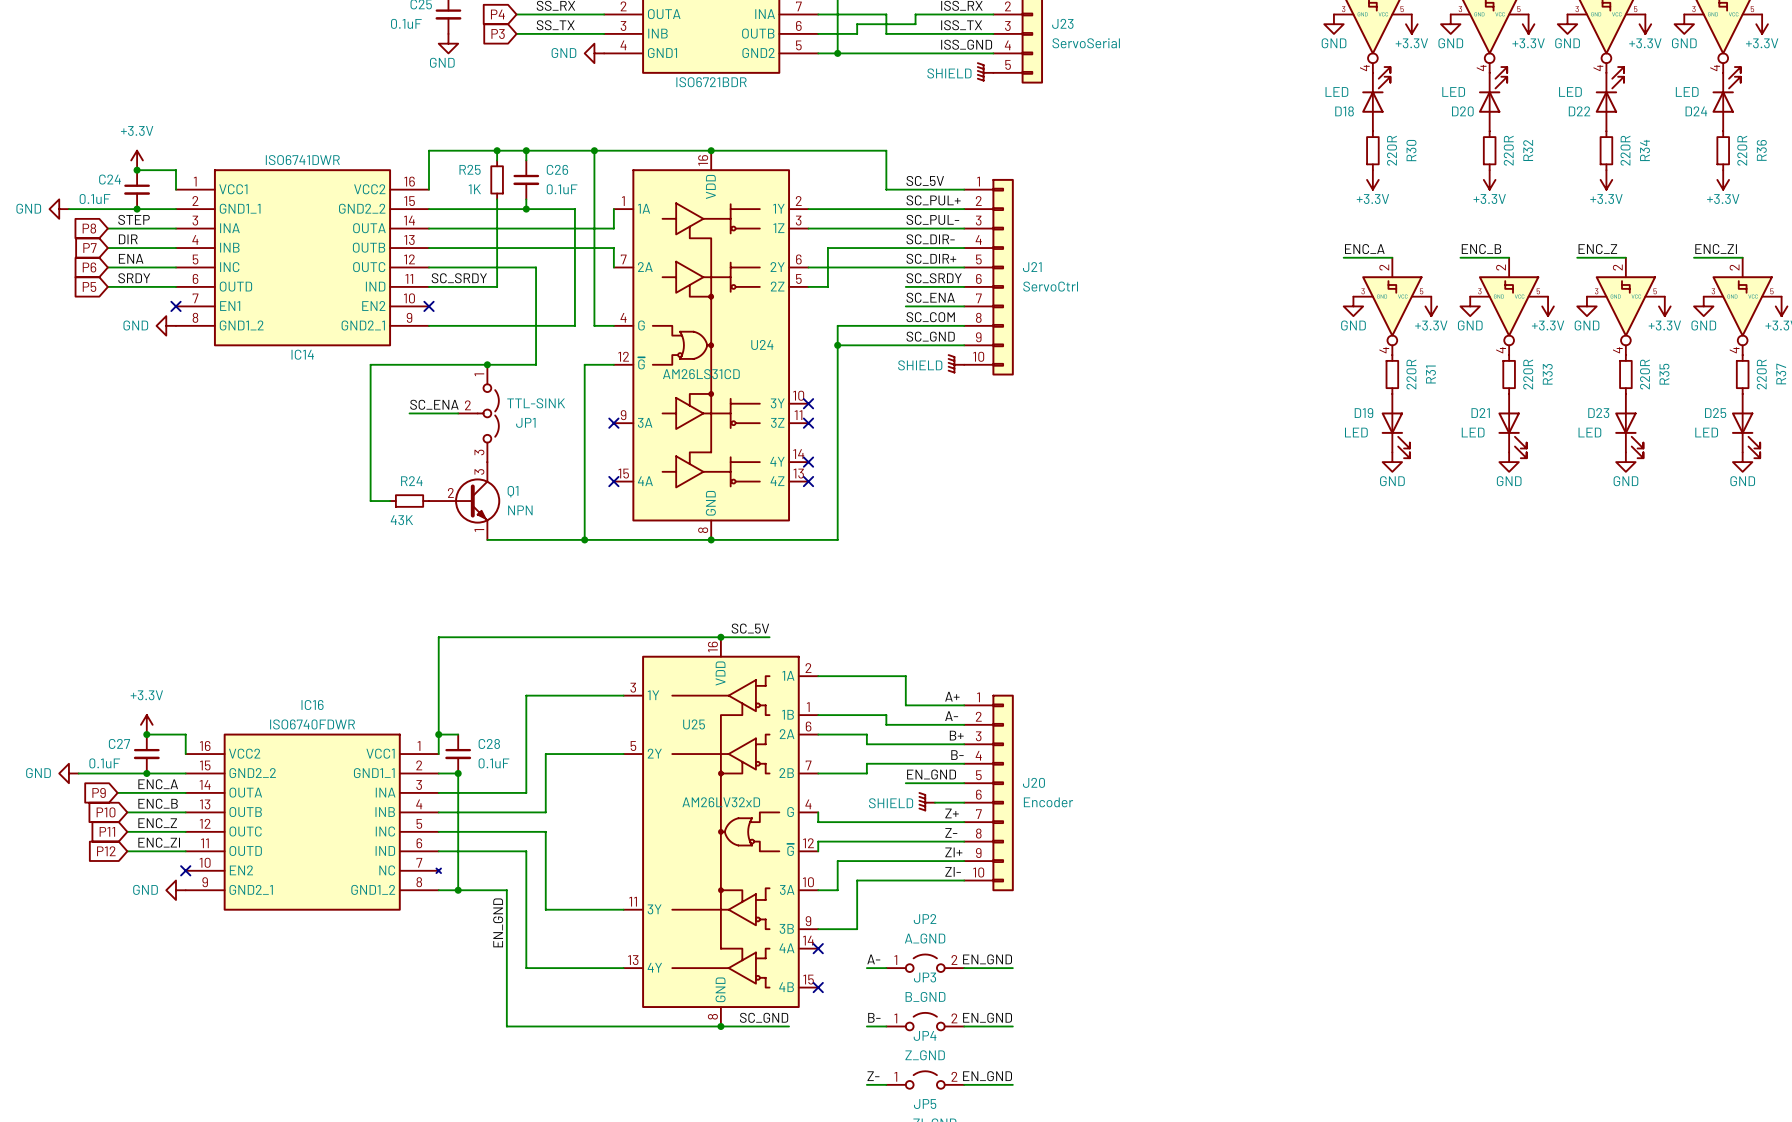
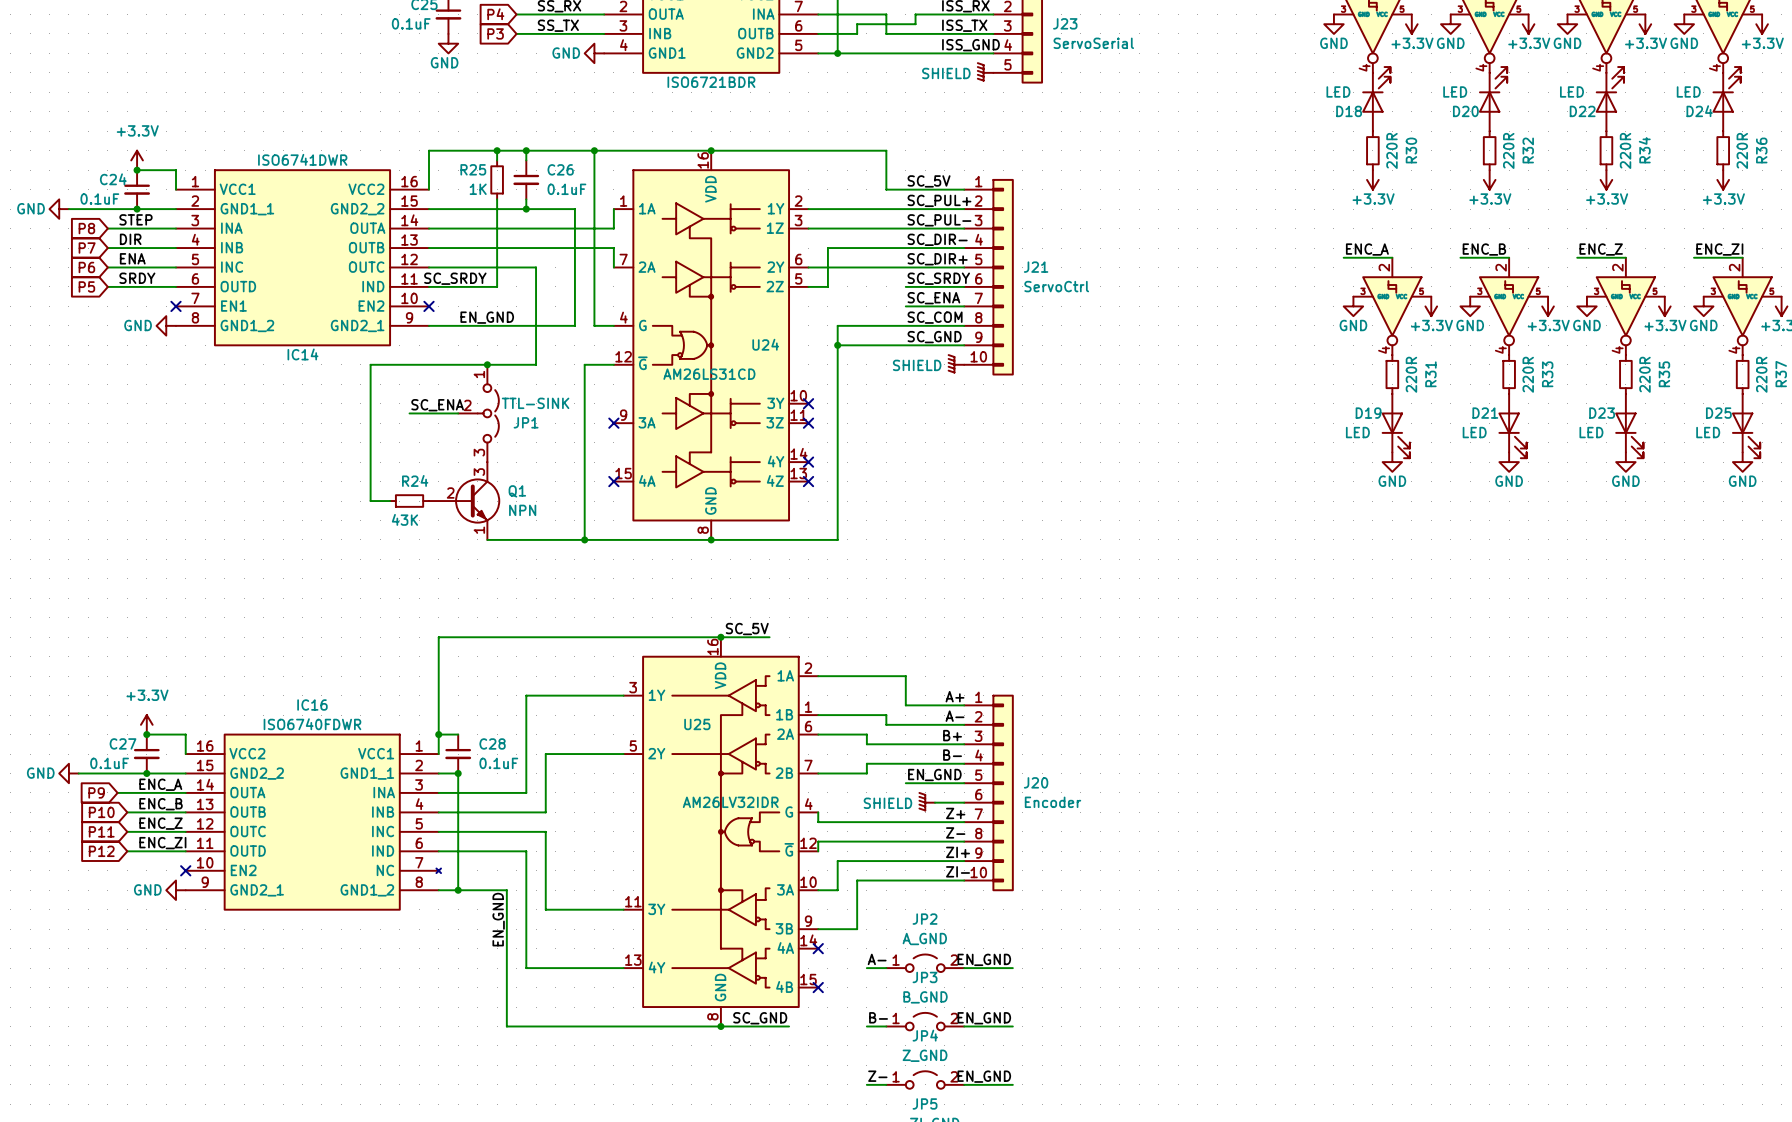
label: none -> EN_GND (487, 317)
U25 value: AM26LV32xD (721, 802) -> AM26LV32IDR (730, 802)

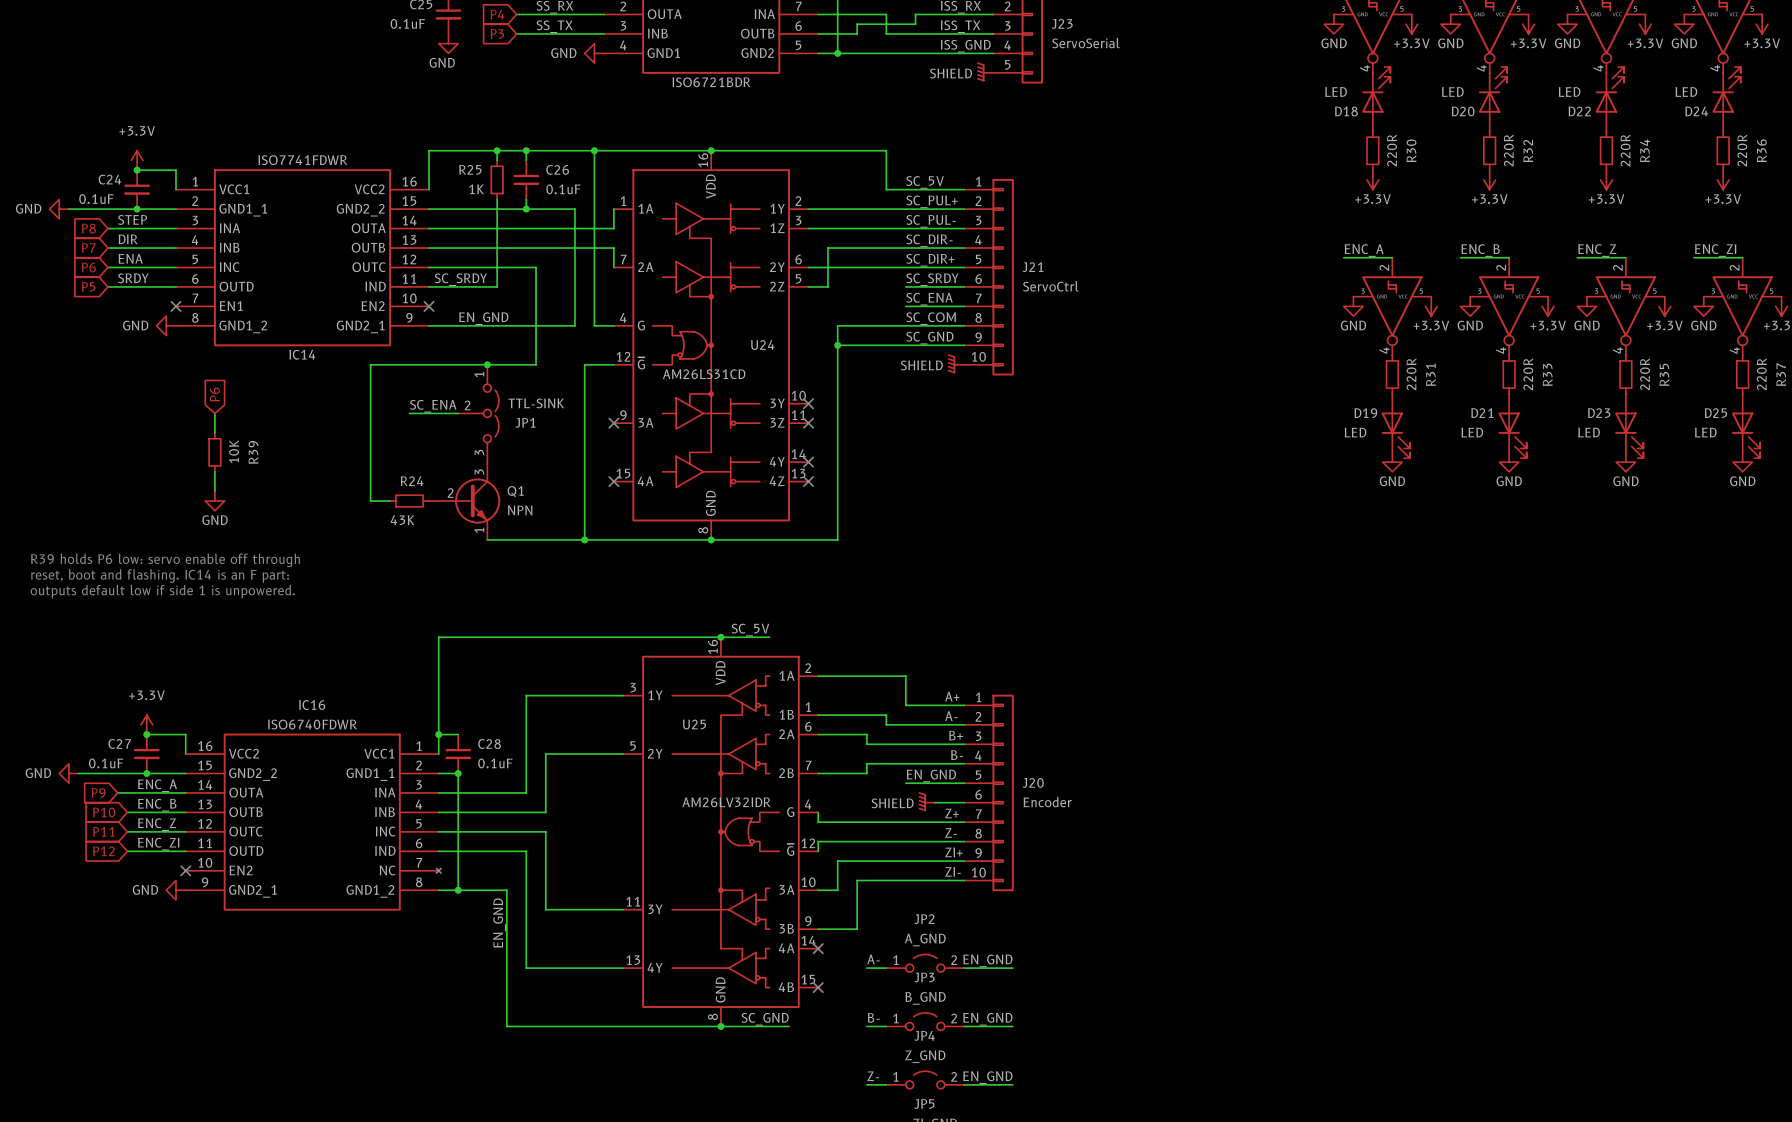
IC14 value: ISO6741DWR (302, 159) -> ISO7741FDWR (302, 160)
global label: none -> P6 (214, 394)
wire: none -> (214, 413) (214, 432)
R39: none -> 10K (214, 452)
wire: none -> (214, 471) (214, 491)
power symbol: none -> GND (214, 501)
text: none -> R39 holds P6 low: servo enable off through (165, 560)
text: none -> reset, boot and flashing. IC14 is an F part: (160, 576)
text: none -> outputs default low if side 1 is unpowered. (162, 591)

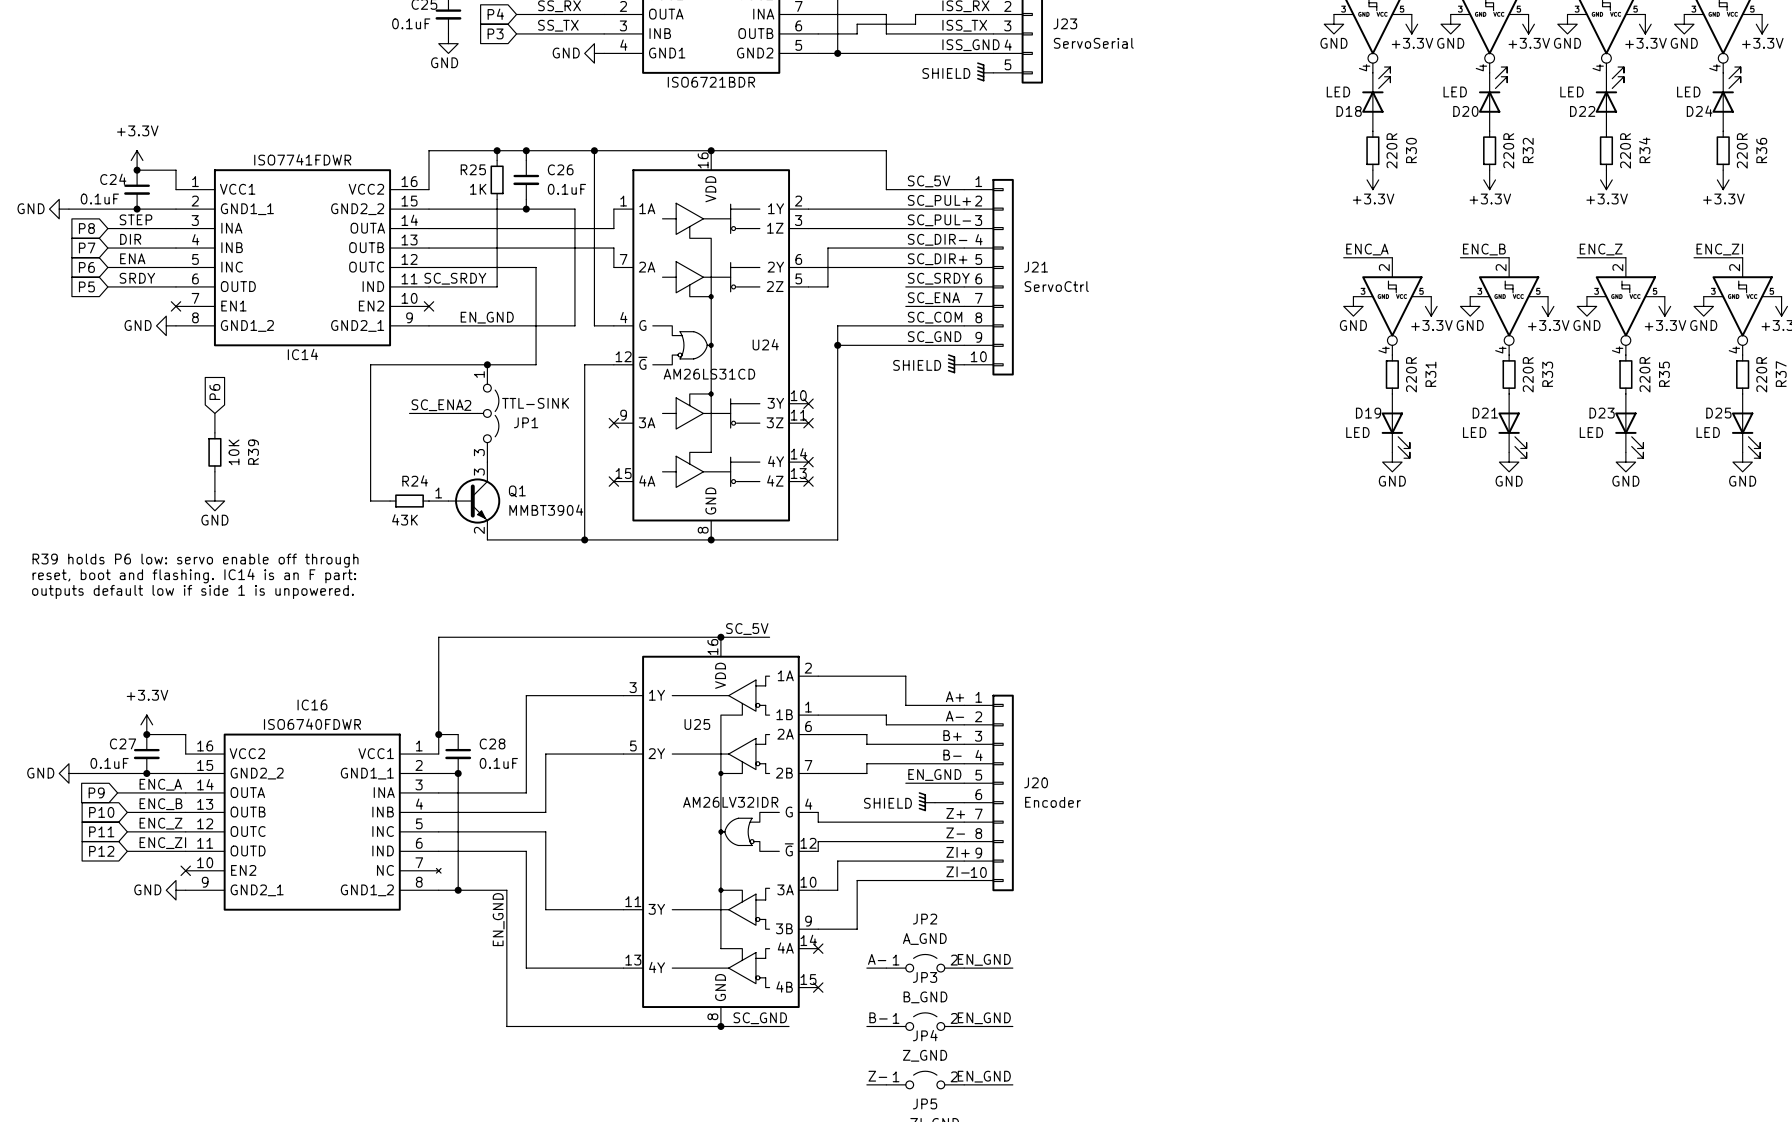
Q1 symbol: [429, 462, 501, 540] -> [429, 462, 501, 540]
Q1 value: NPN (520, 510) -> MMBT3904 (546, 510)

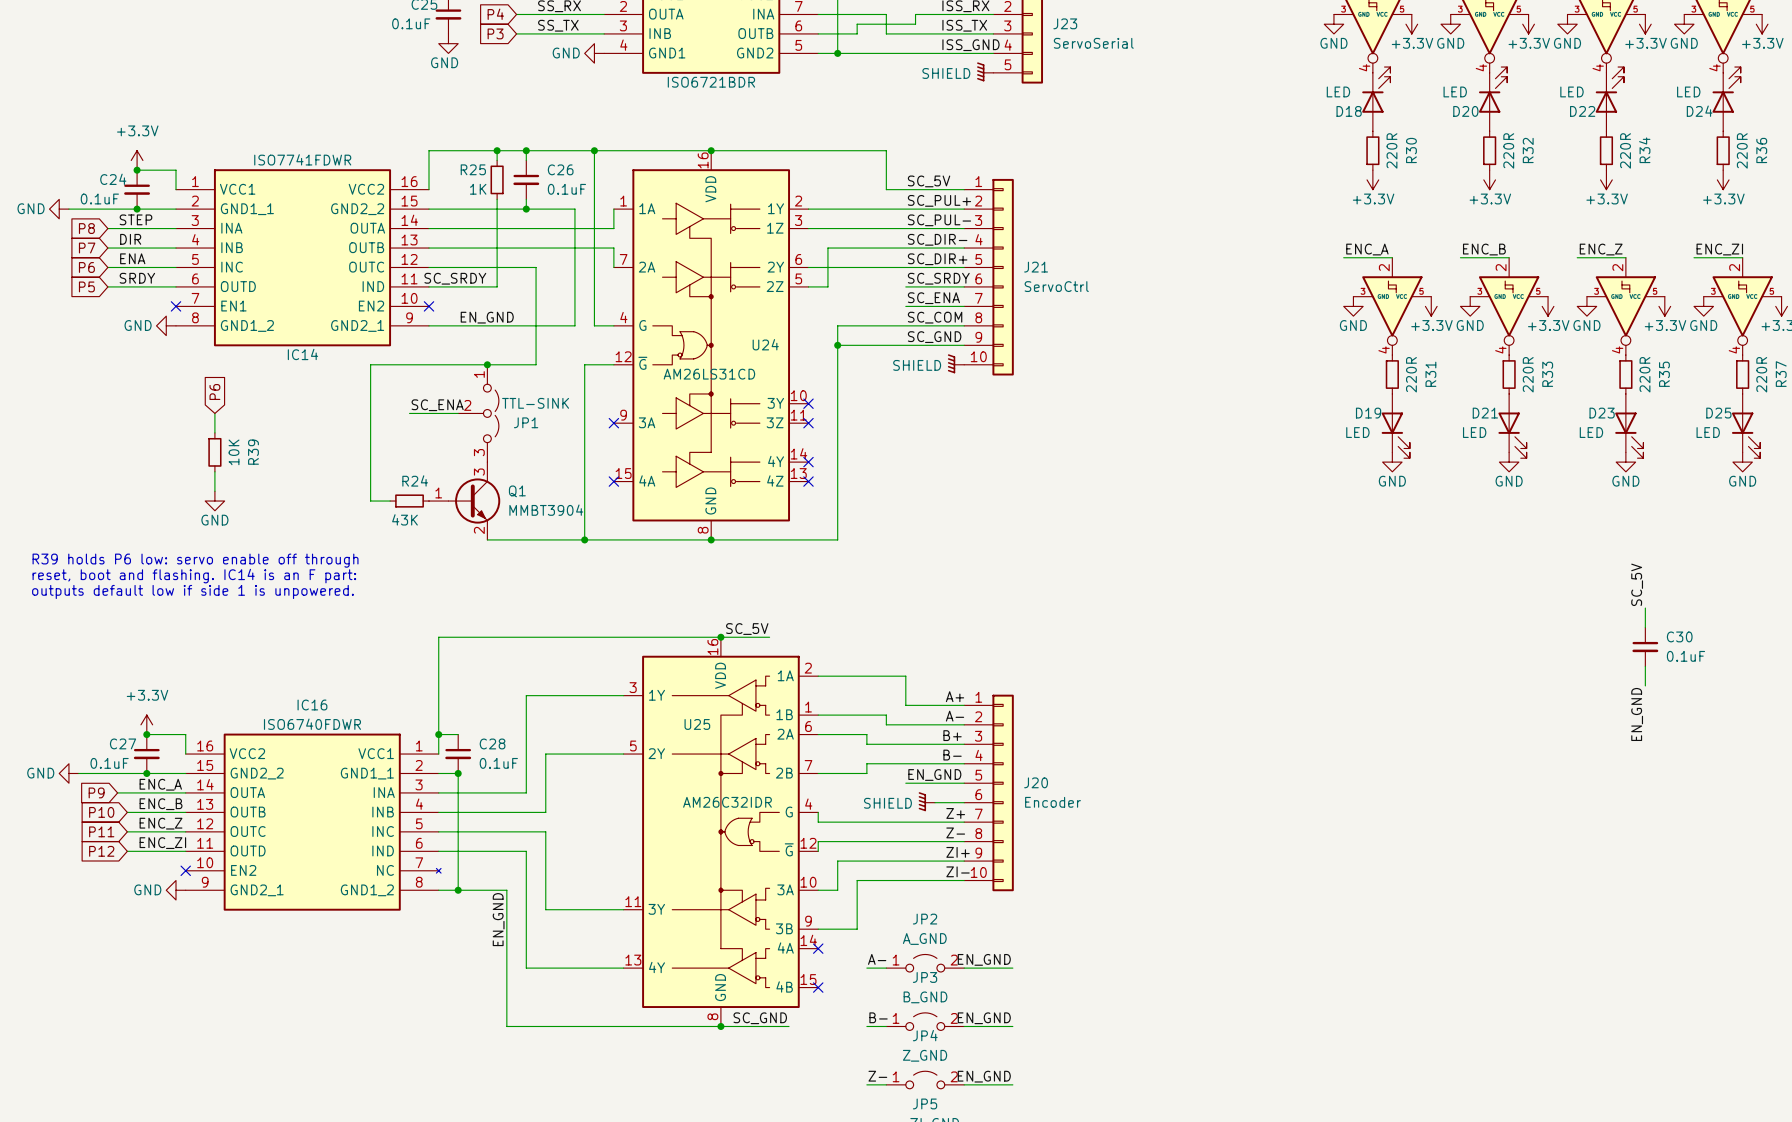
label: none -> SC_5V (1637, 584)
wire: none -> (1645, 608) (1645, 627)
C30: none -> 0.1uF (1645, 646)
wire: none -> (1645, 666) (1645, 685)
label: none -> EN_GND (1637, 714)
U25 value: AM26LV32IDR (730, 802) -> AM26C32IDR (727, 802)

